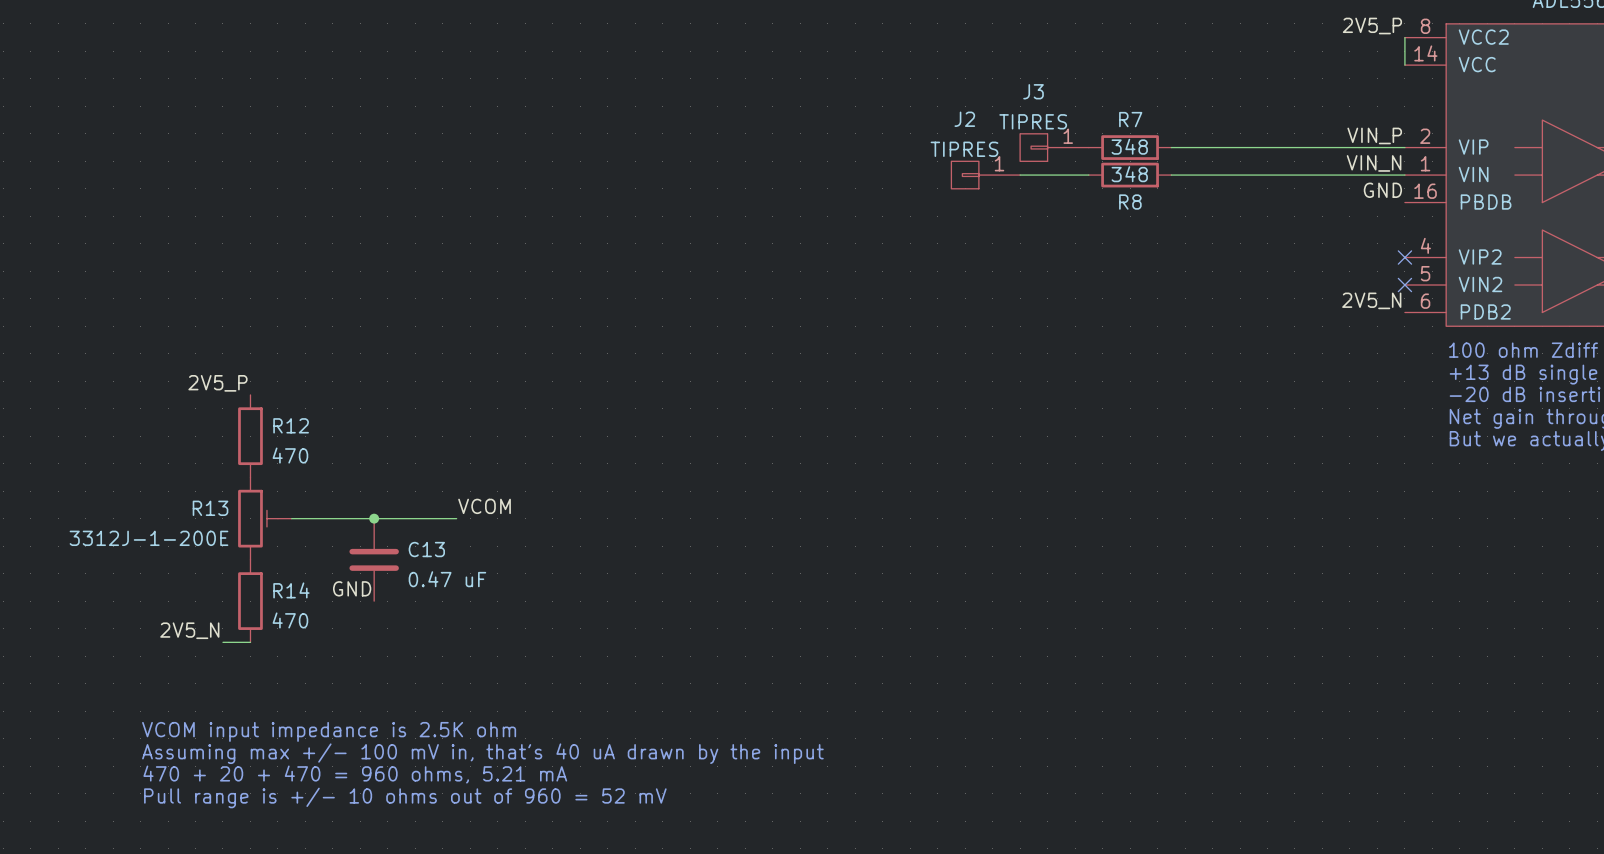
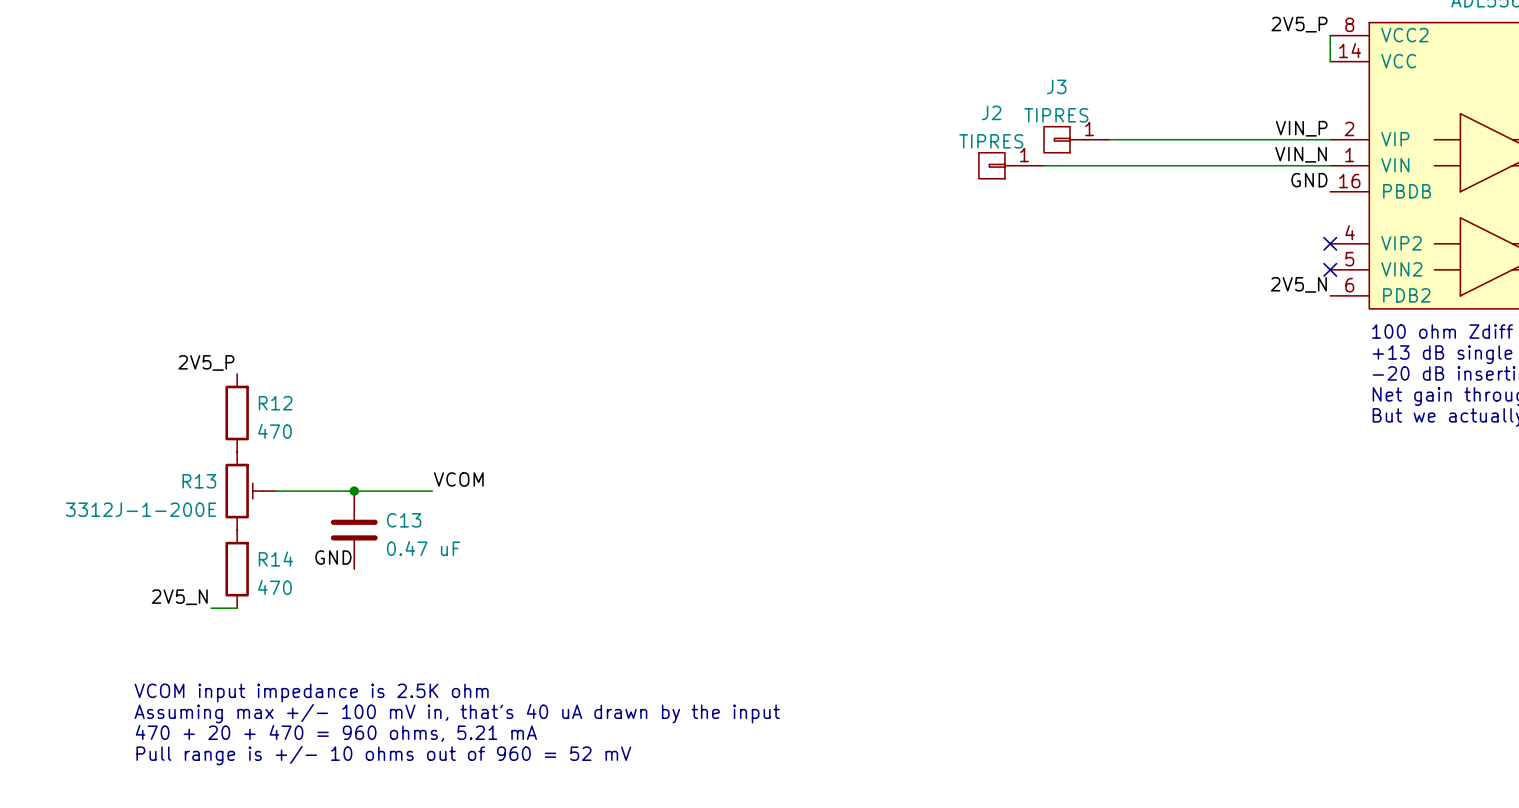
J3 position: (1054, 147) -> (1076, 139)
R7: 348 (1130, 147) -> none
J2 position: (985, 175) -> (1011, 165)
wire: (1020, 175) (1088, 175) -> (1043, 165) (1109, 165)
R8: 348 (1130, 175) -> none

